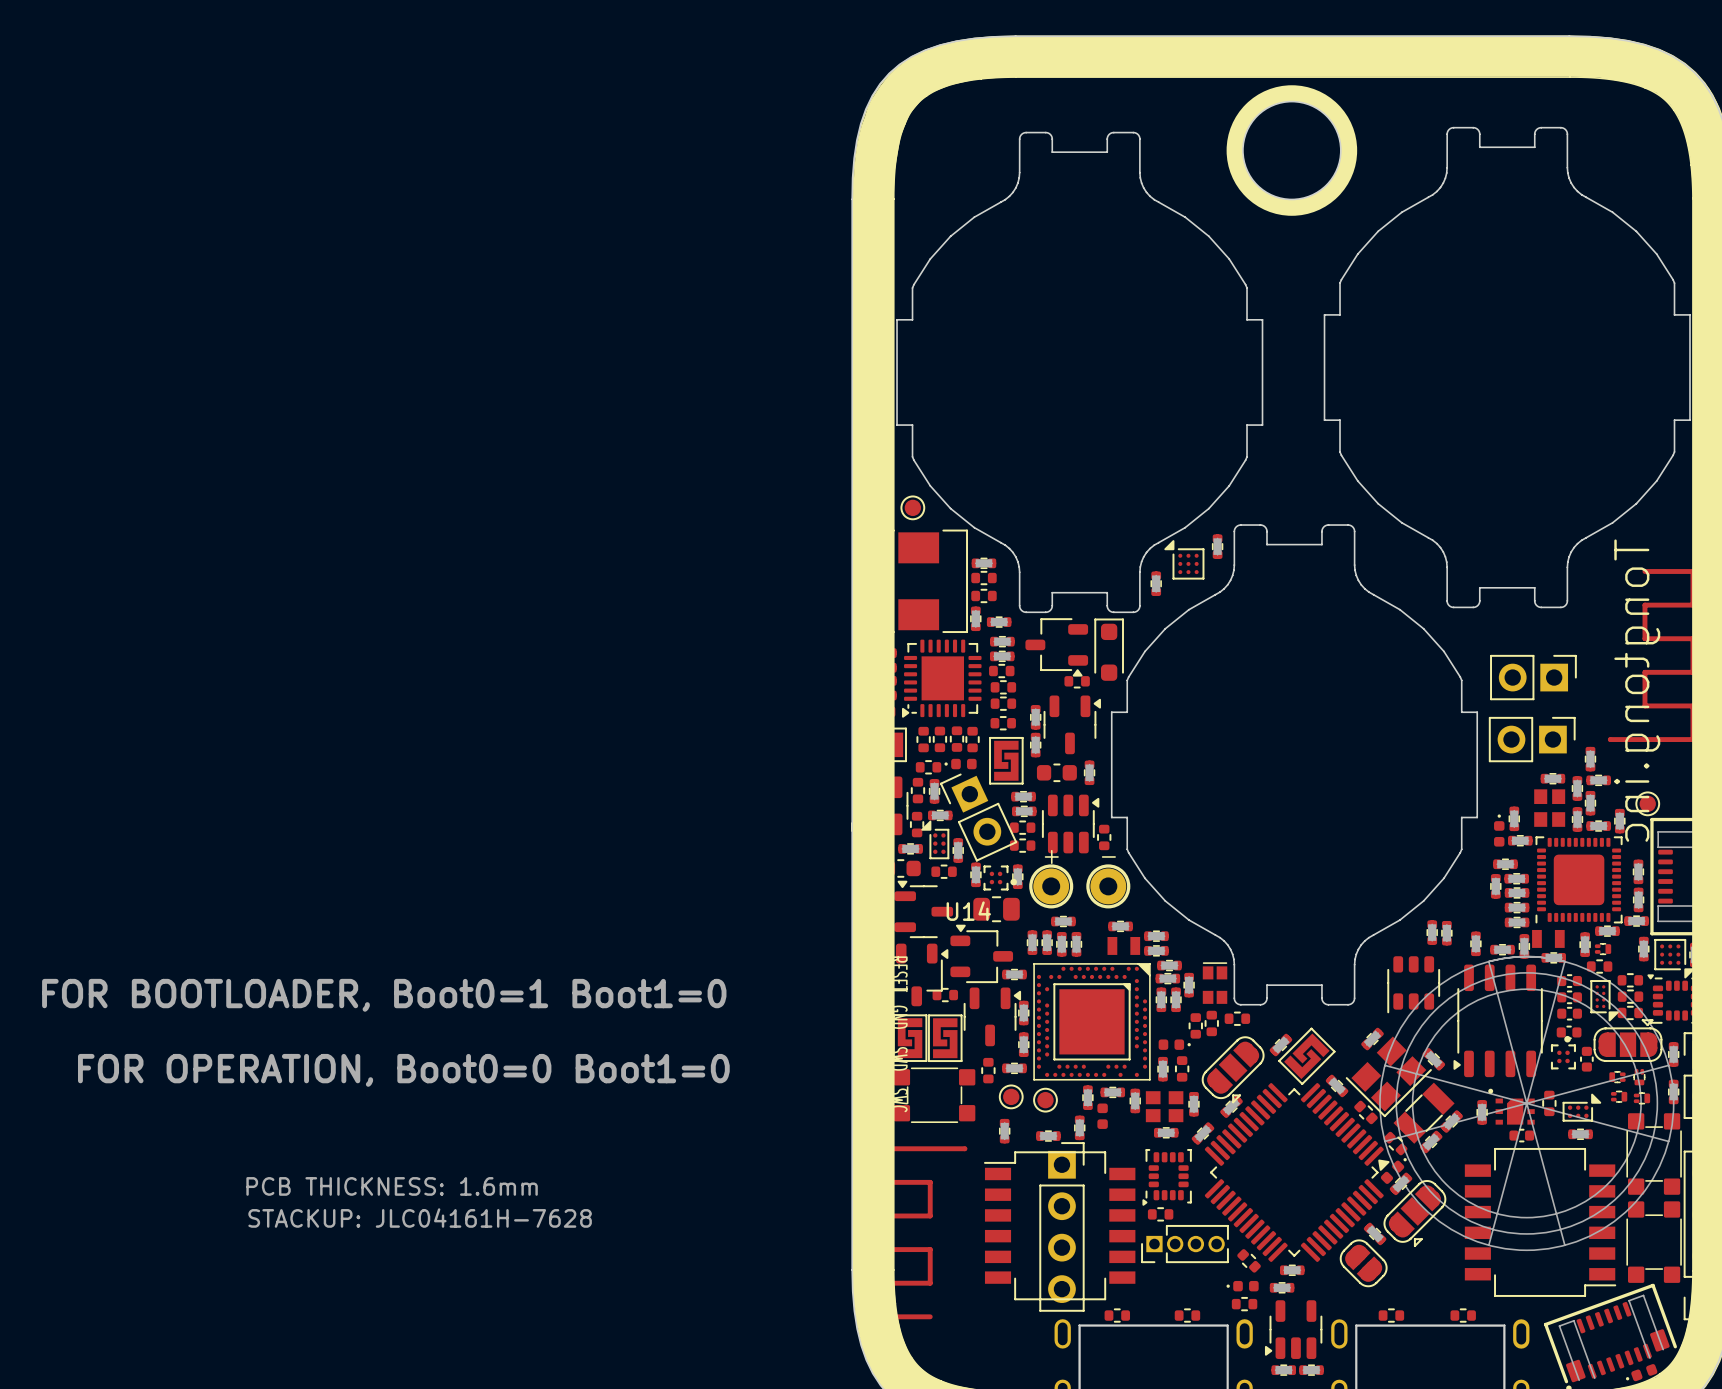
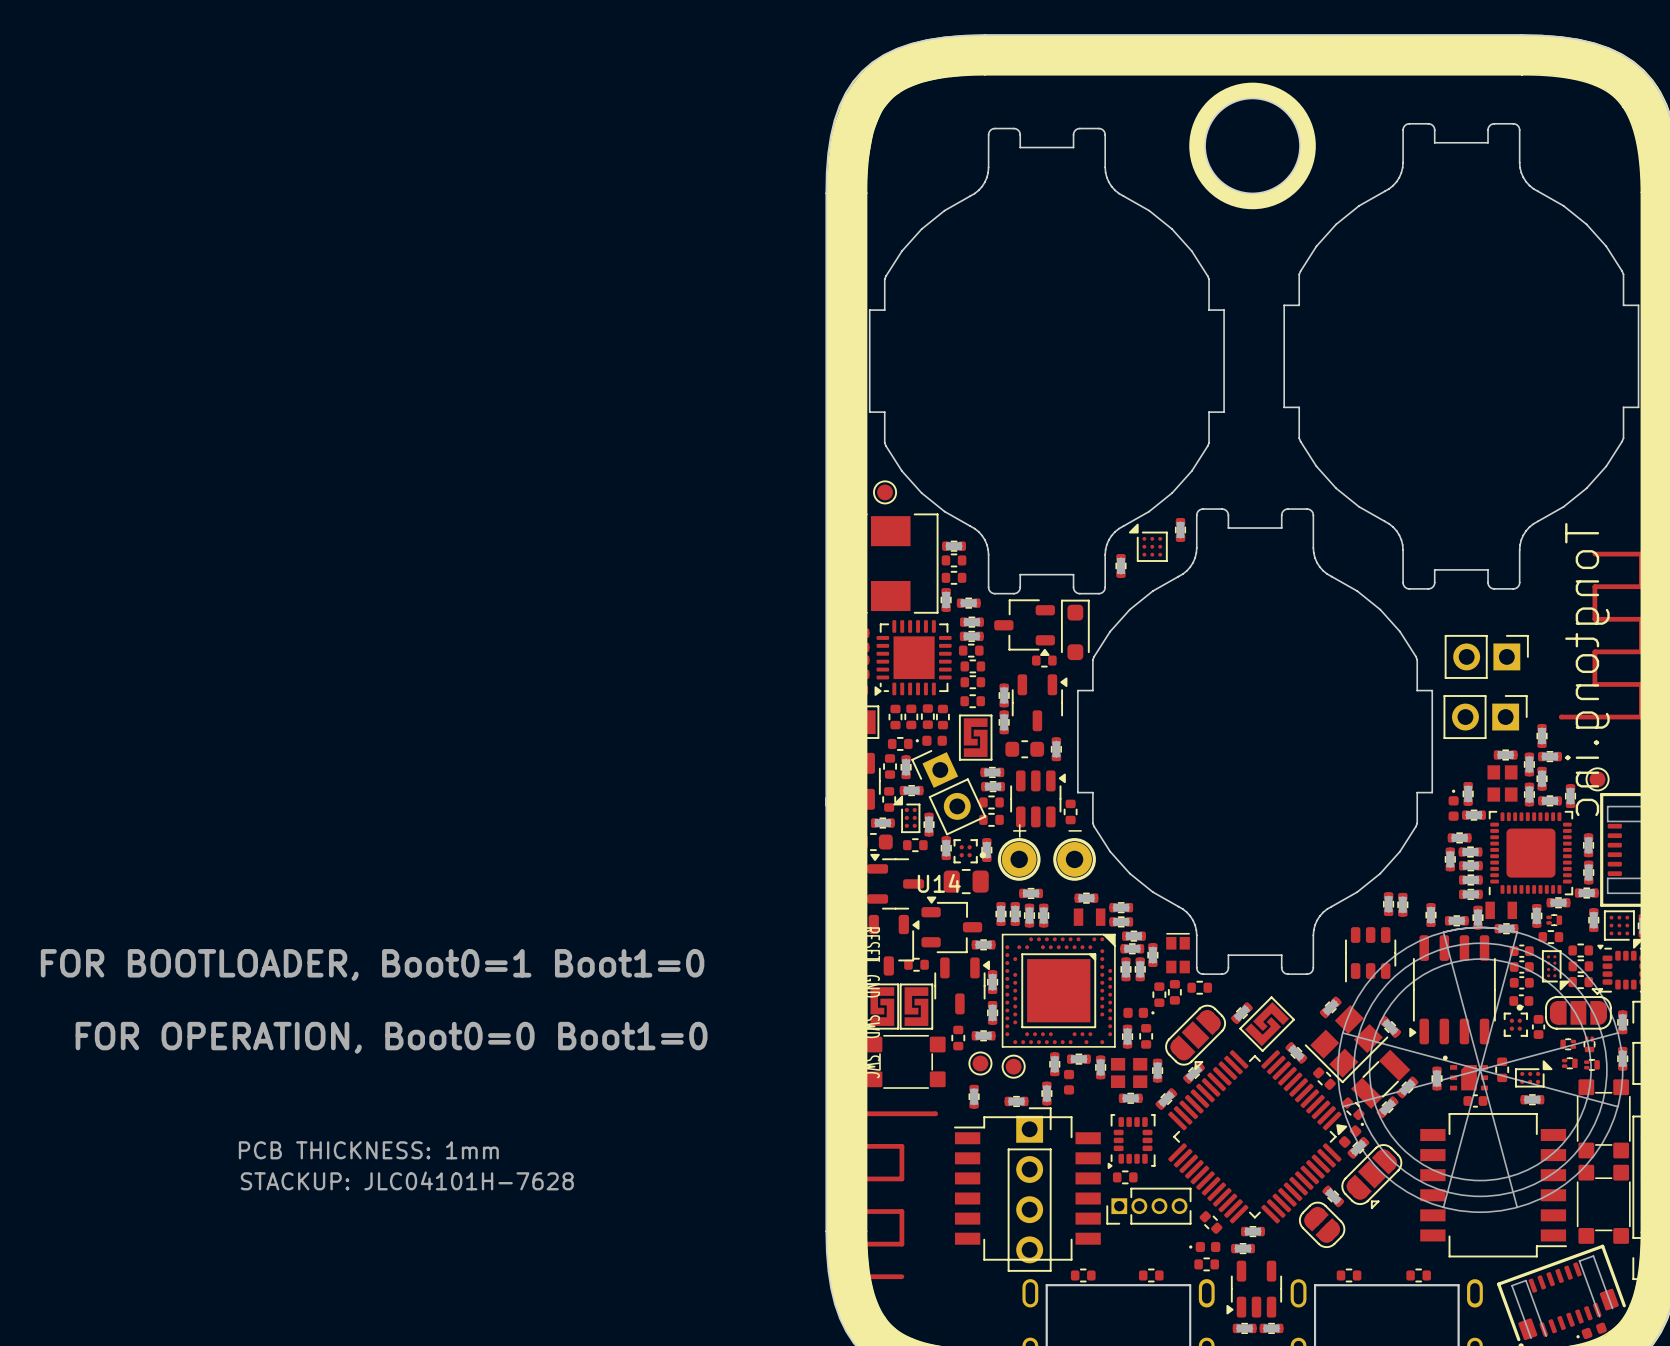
text: PCB THICKNESS: 1.6mm (392, 1186) -> PCB THICKNESS: 1mm (368, 1150)
text: STACKUP: JLC04161H-7628 (420, 1218) -> STACKUP: JLC04101H-7628 (407, 1180)

